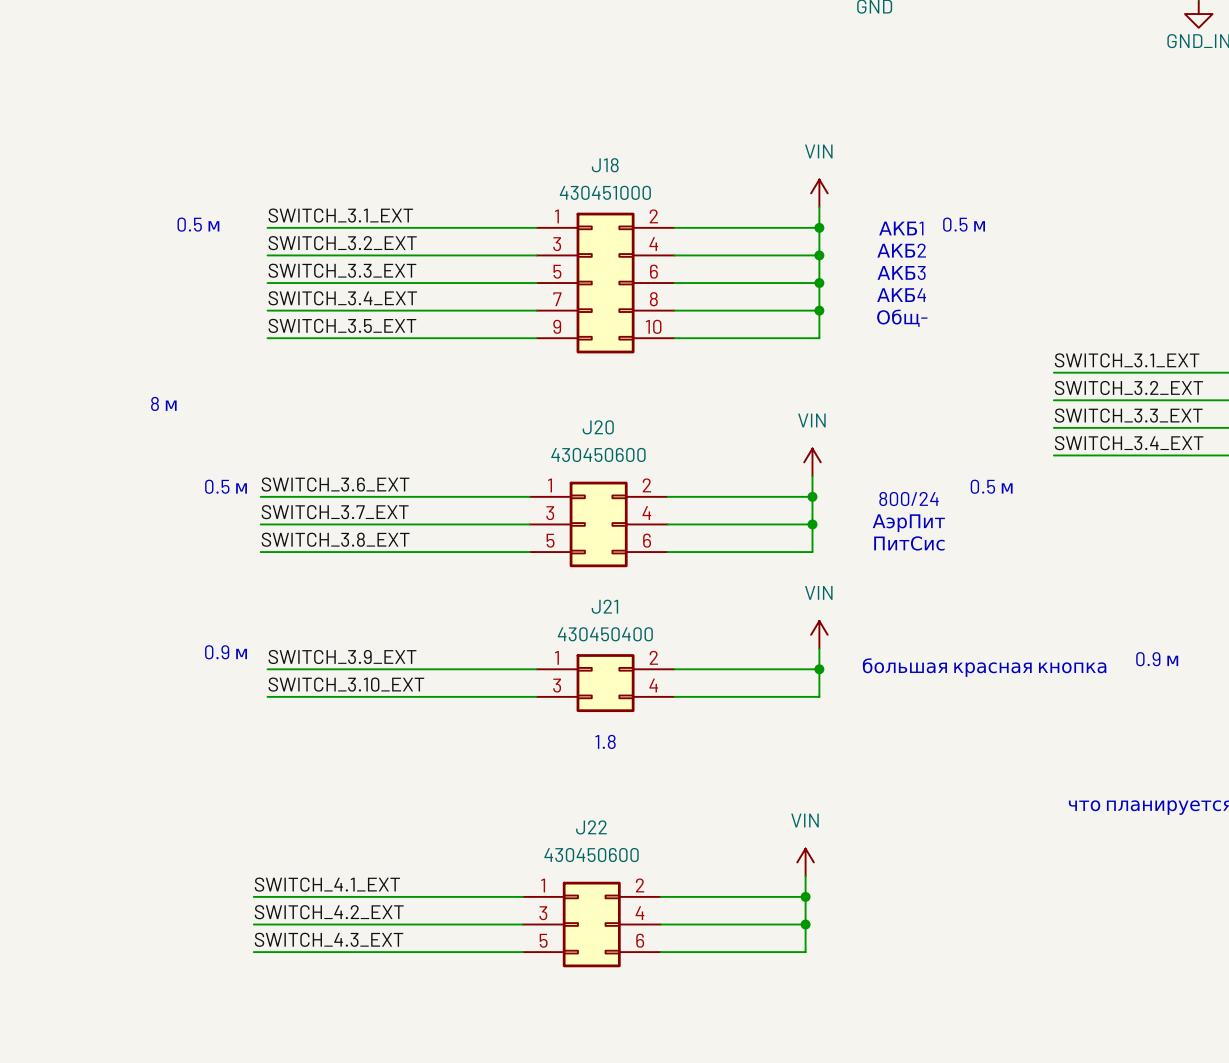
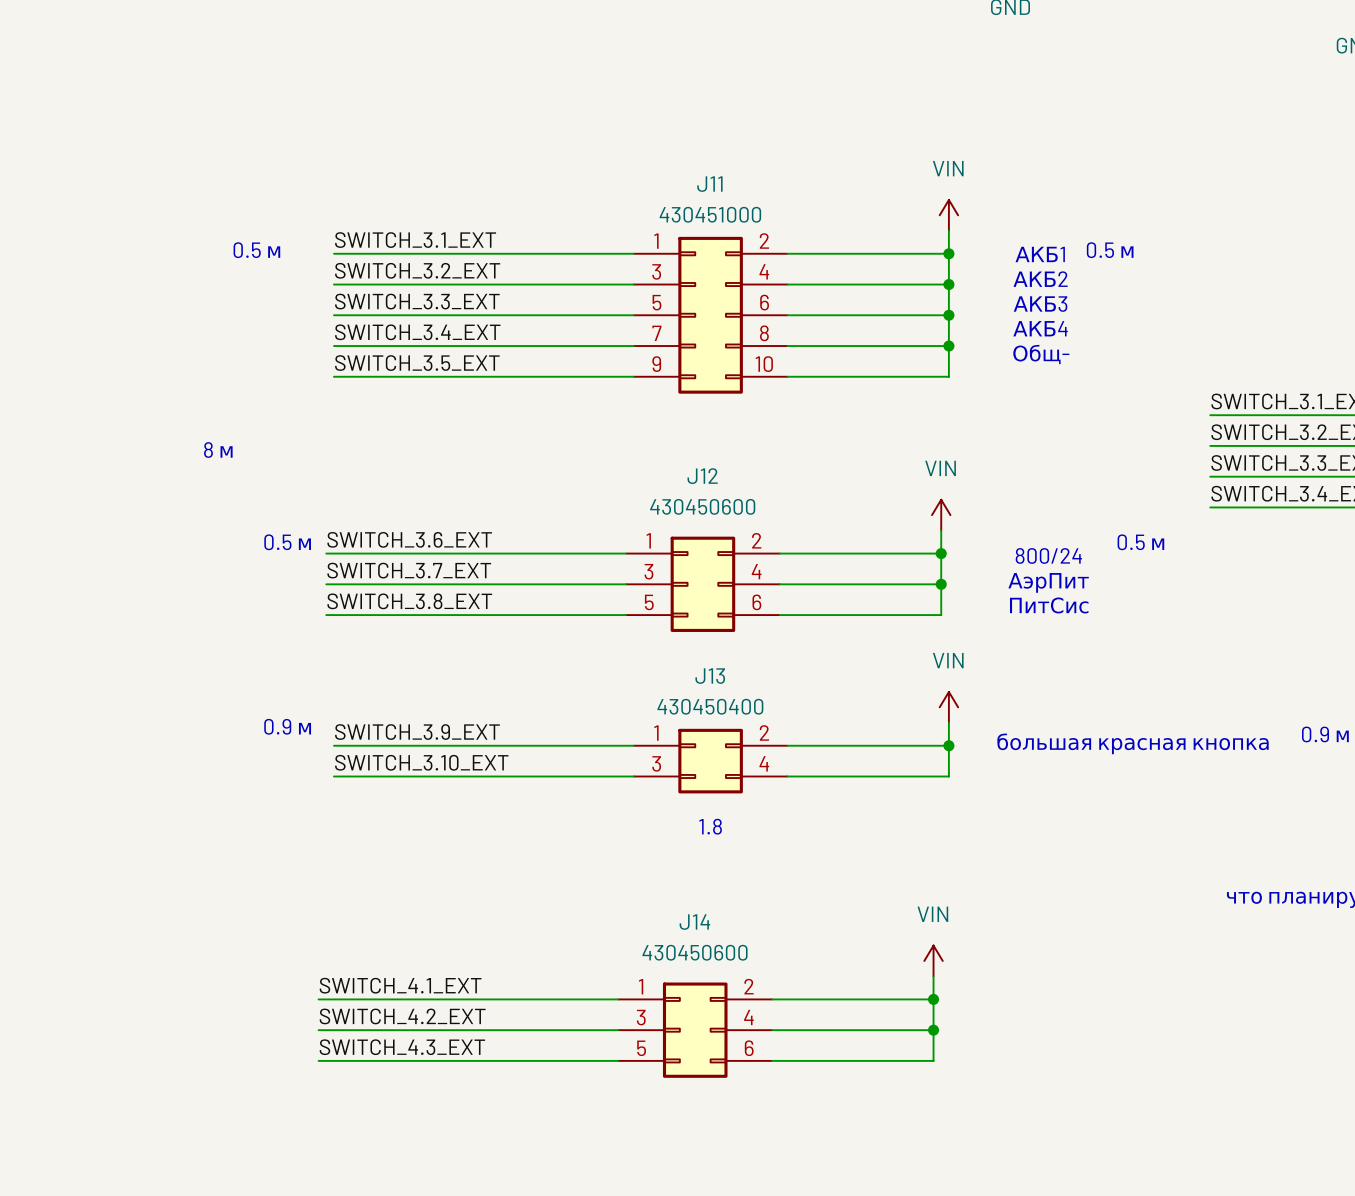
J18 name: J18 (605, 165) -> J11 (709, 184)
J20 name: J20 (598, 427) -> J12 (702, 476)
J21 name: J21 (604, 606) -> J13 (710, 676)
J22 name: J22 (591, 827) -> J14 (694, 922)

